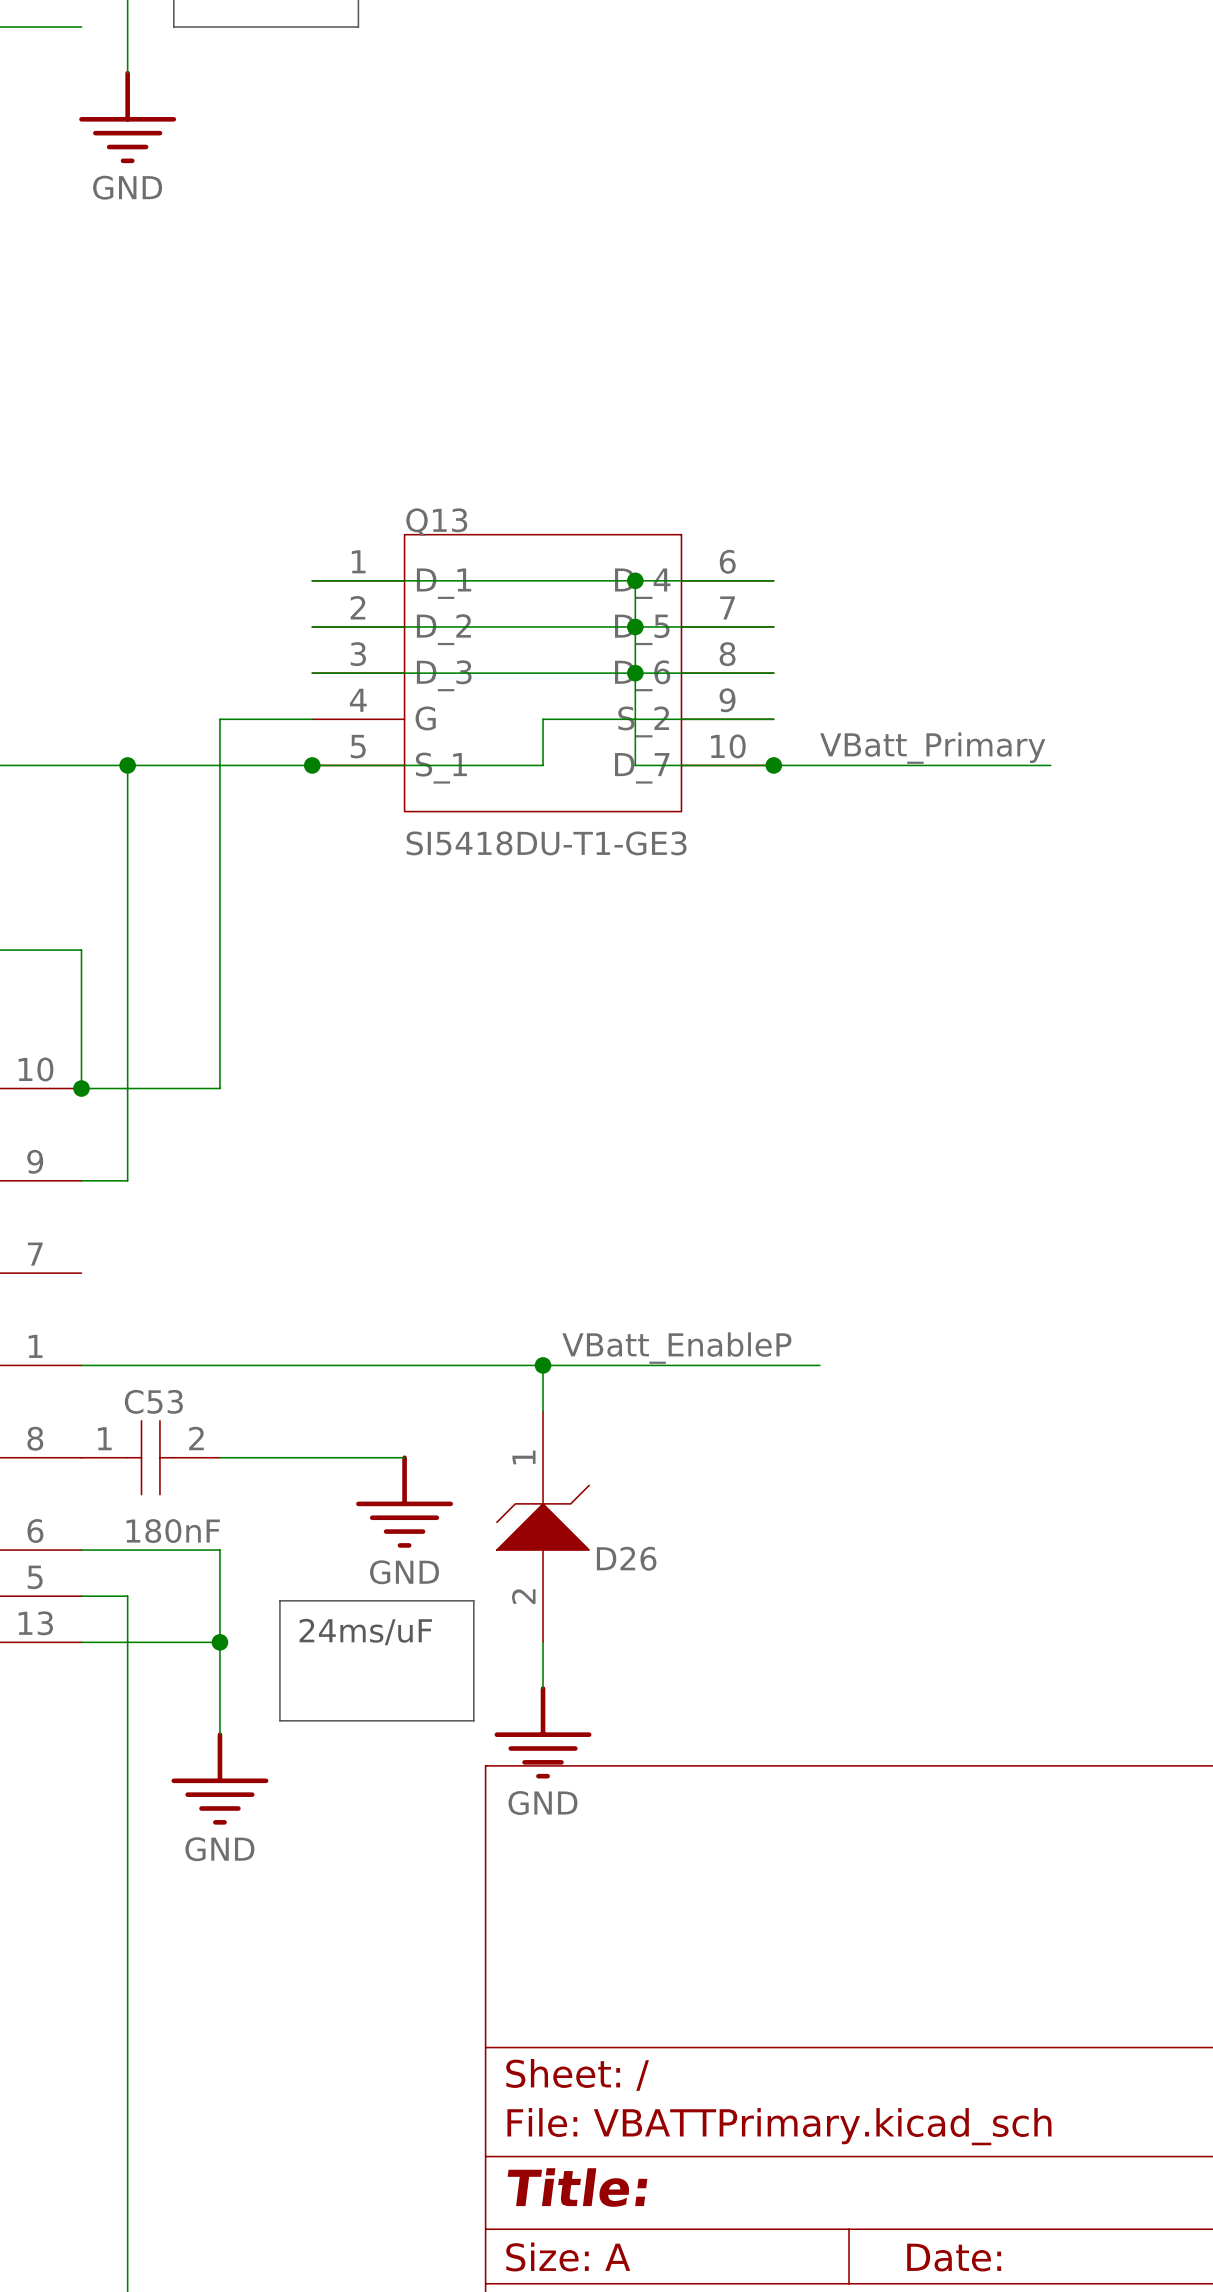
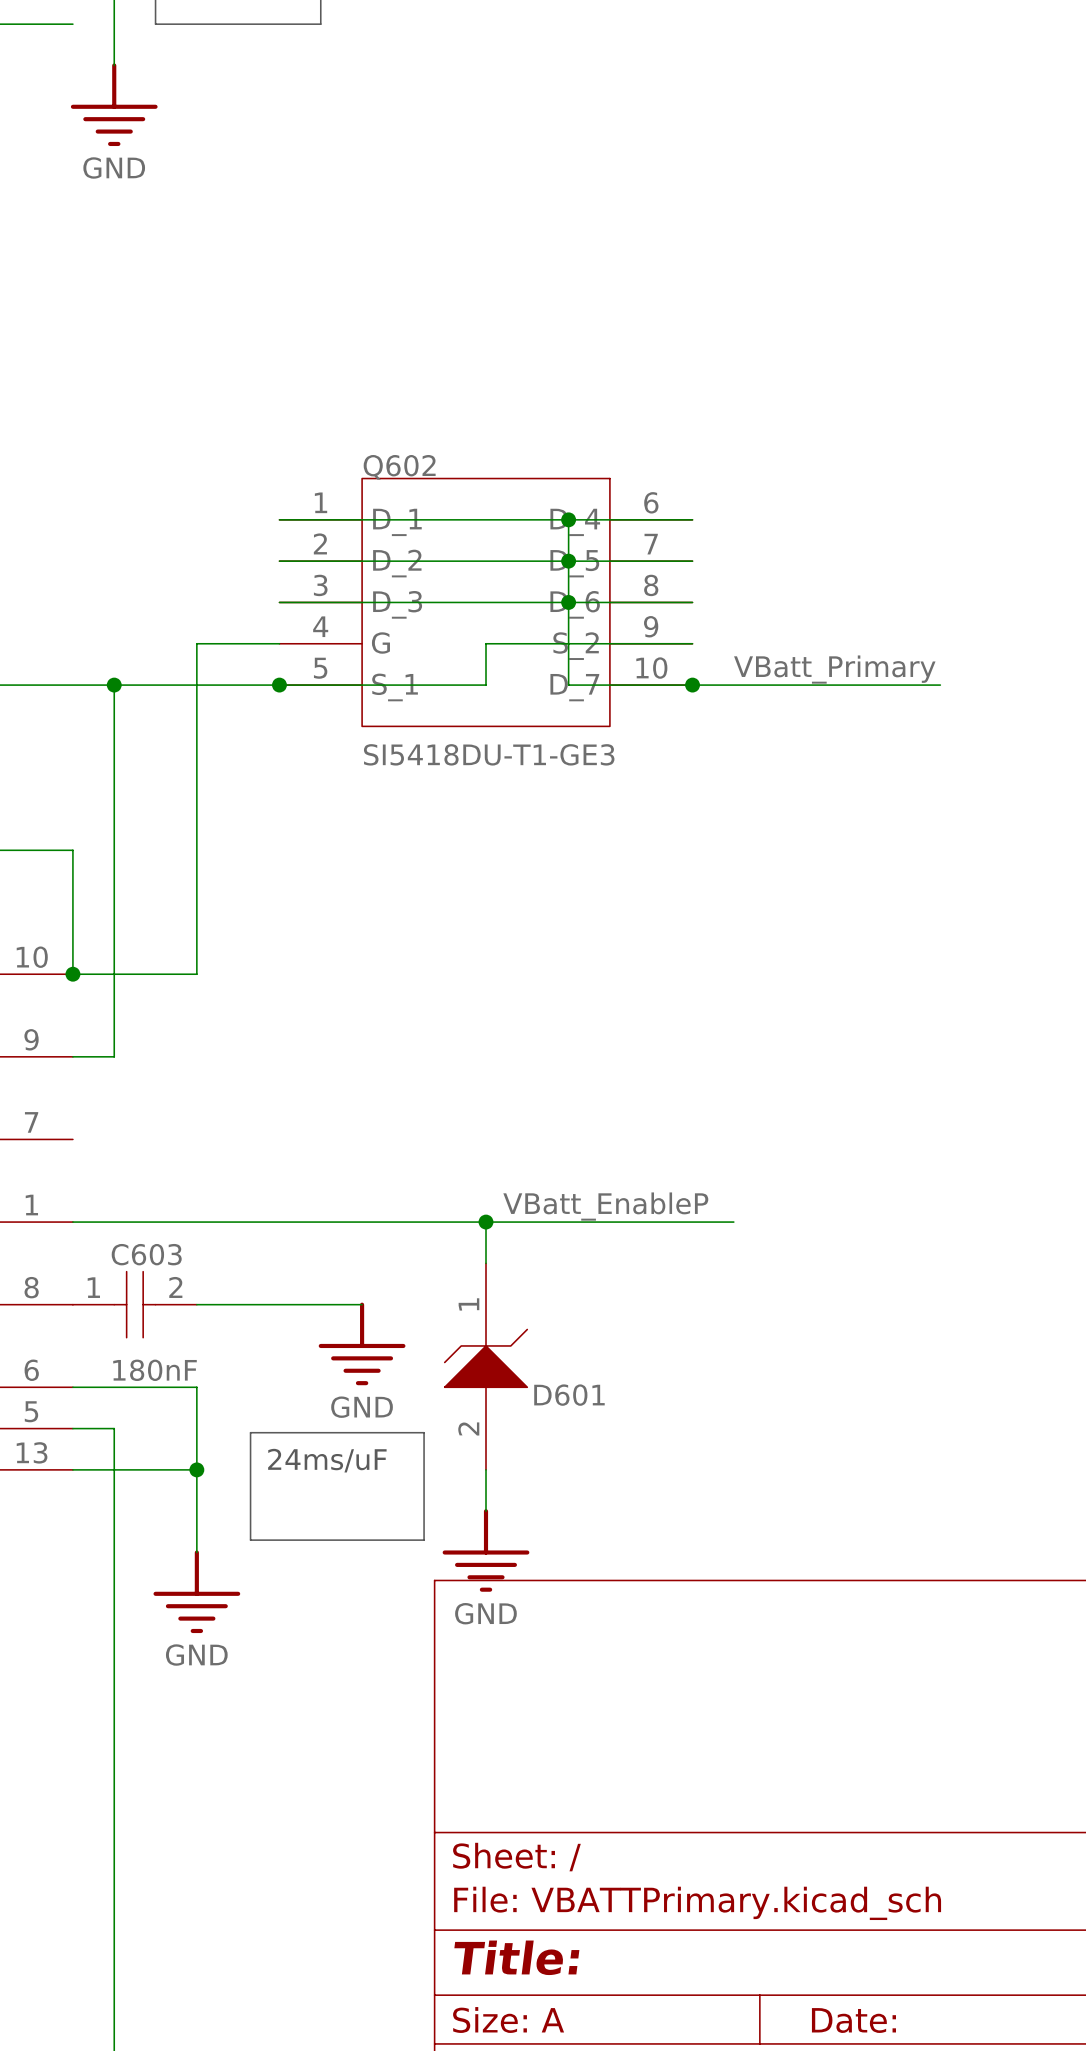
Q13 name: Q13 (436, 522) -> Q602 (399, 467)
C53 name: C53 (153, 1401) -> C603 (146, 1254)
D26 name: D26 (626, 1558) -> D601 (569, 1395)

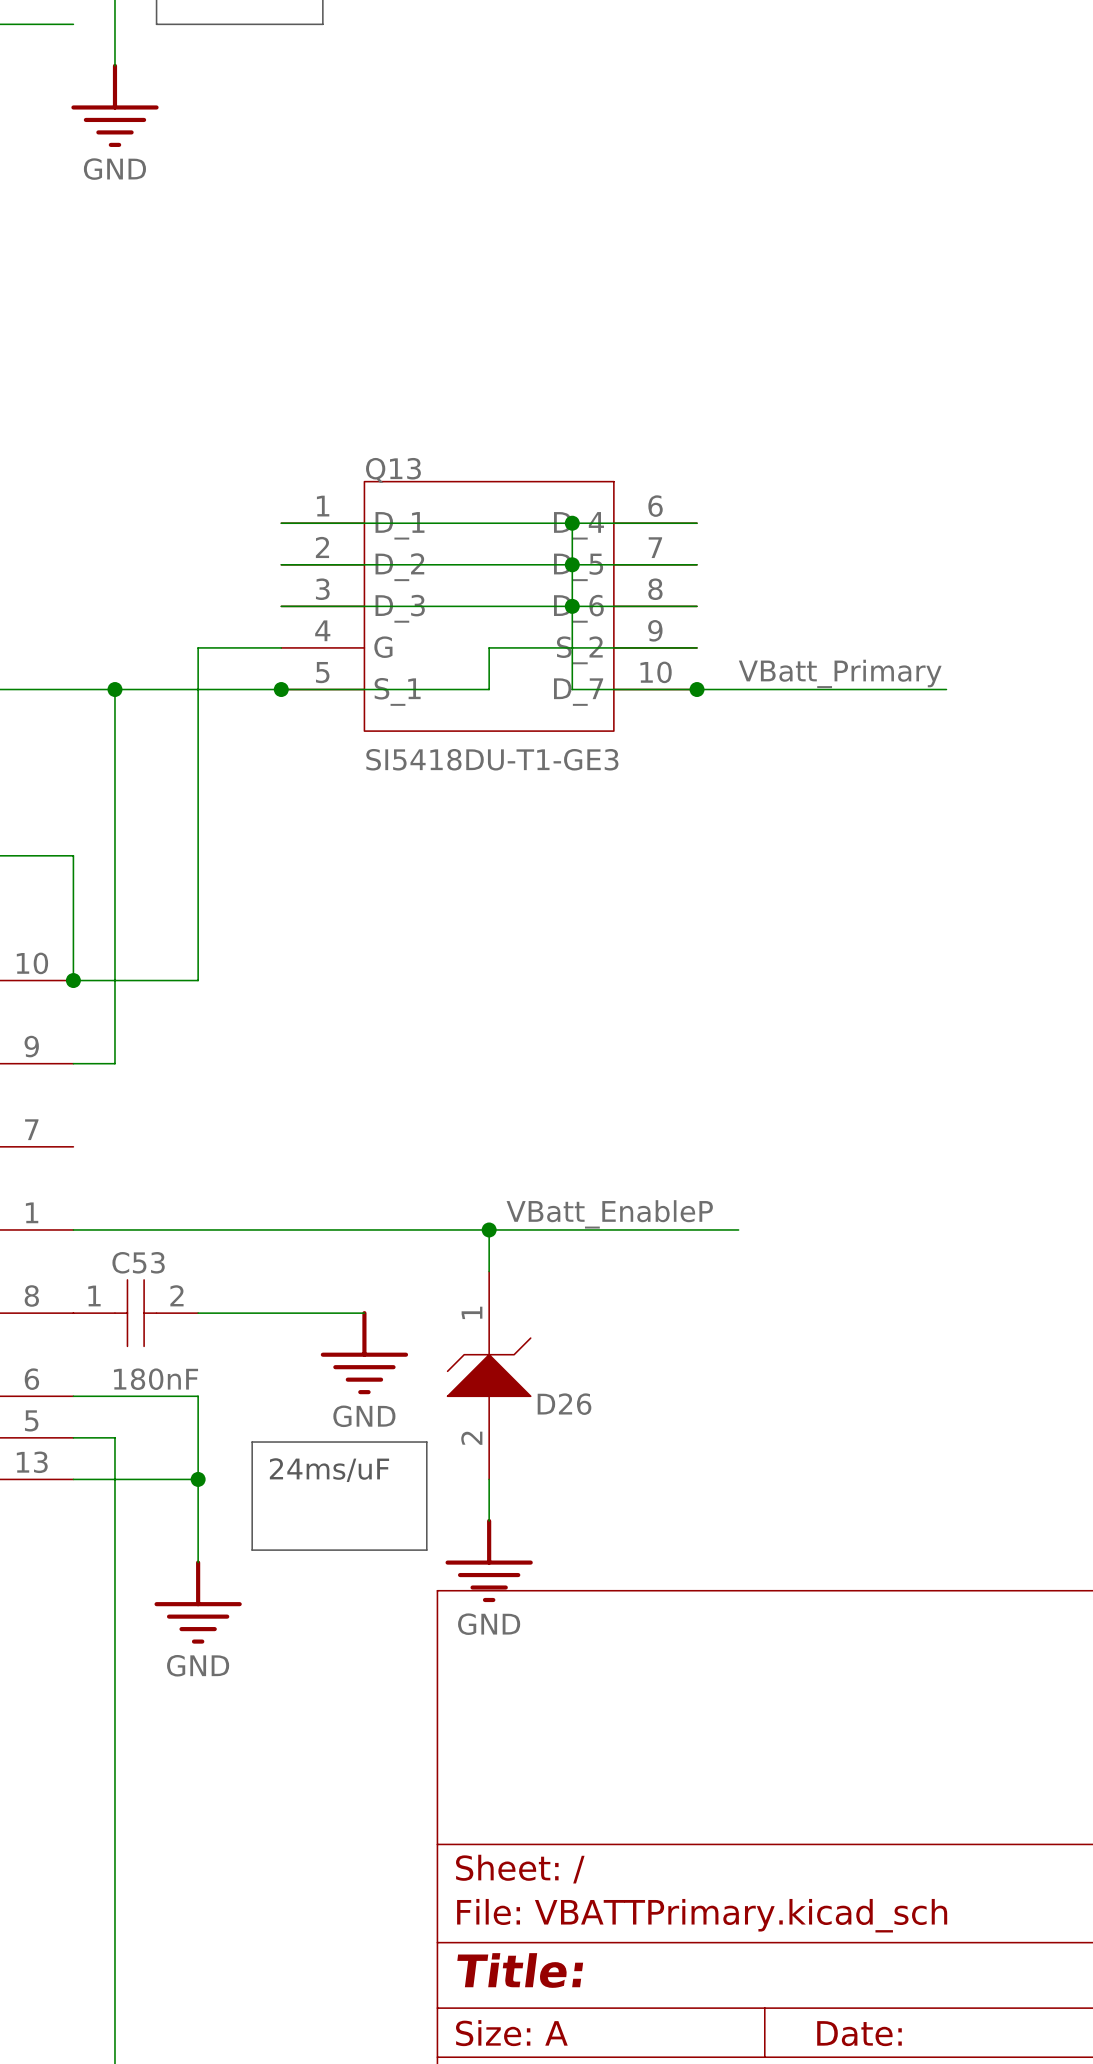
Q602 name: Q602 (399, 467) -> Q13 (393, 470)
C603 name: C603 (146, 1254) -> C53 (138, 1262)
D601 name: D601 (569, 1395) -> D26 (564, 1404)

